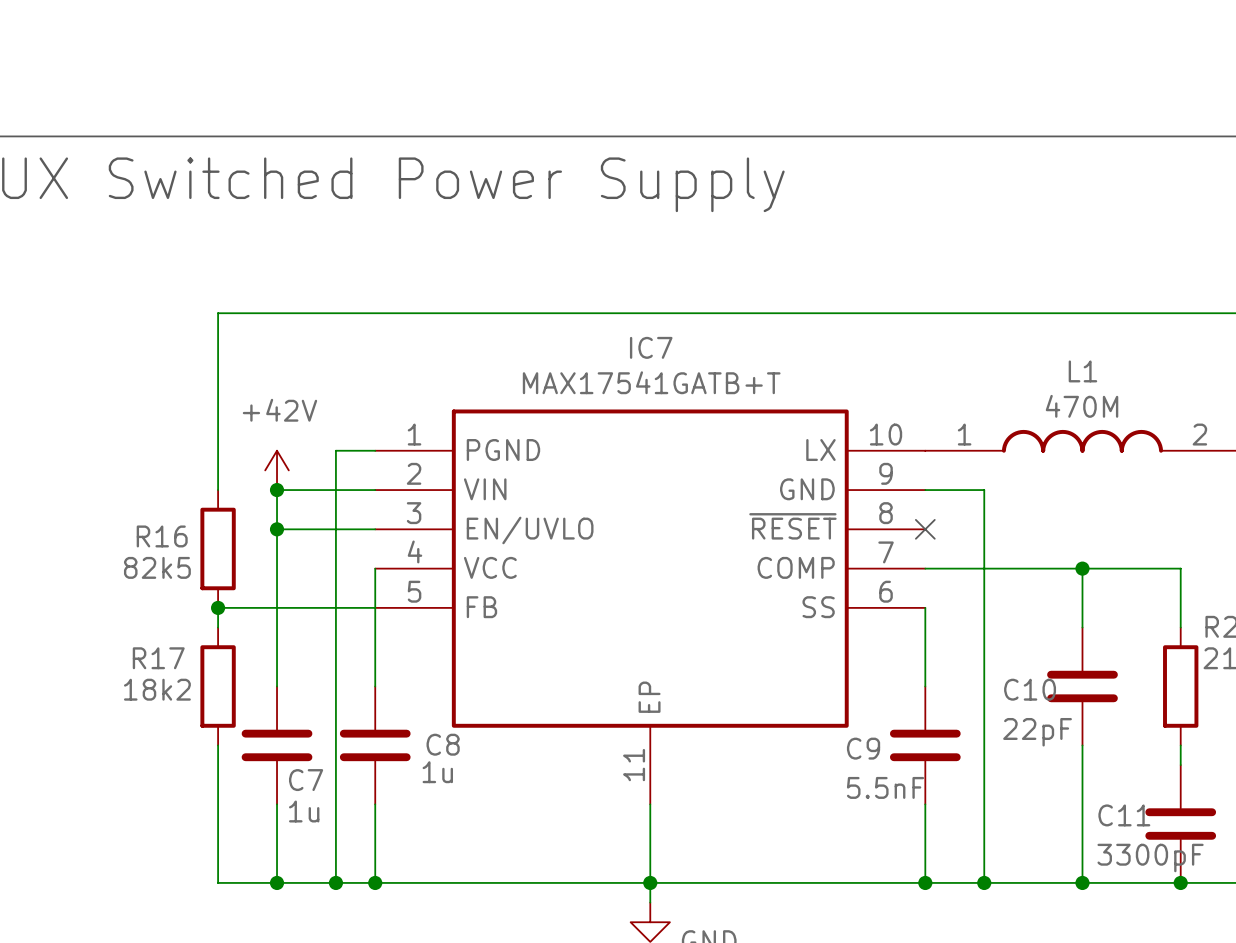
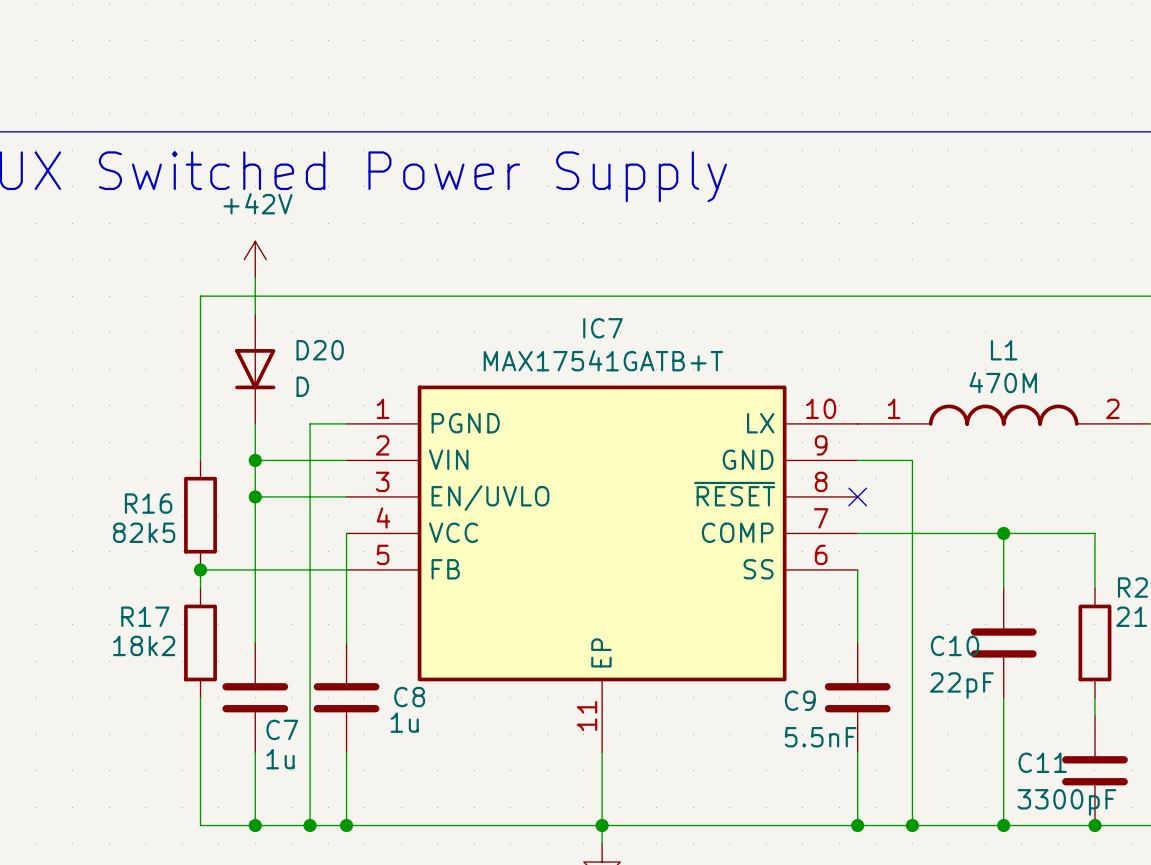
wire: none -> (255, 277) (255, 314)
D20: none -> D (255, 369)
power symbol position: +42V (277, 470) -> +42V (255, 259)

